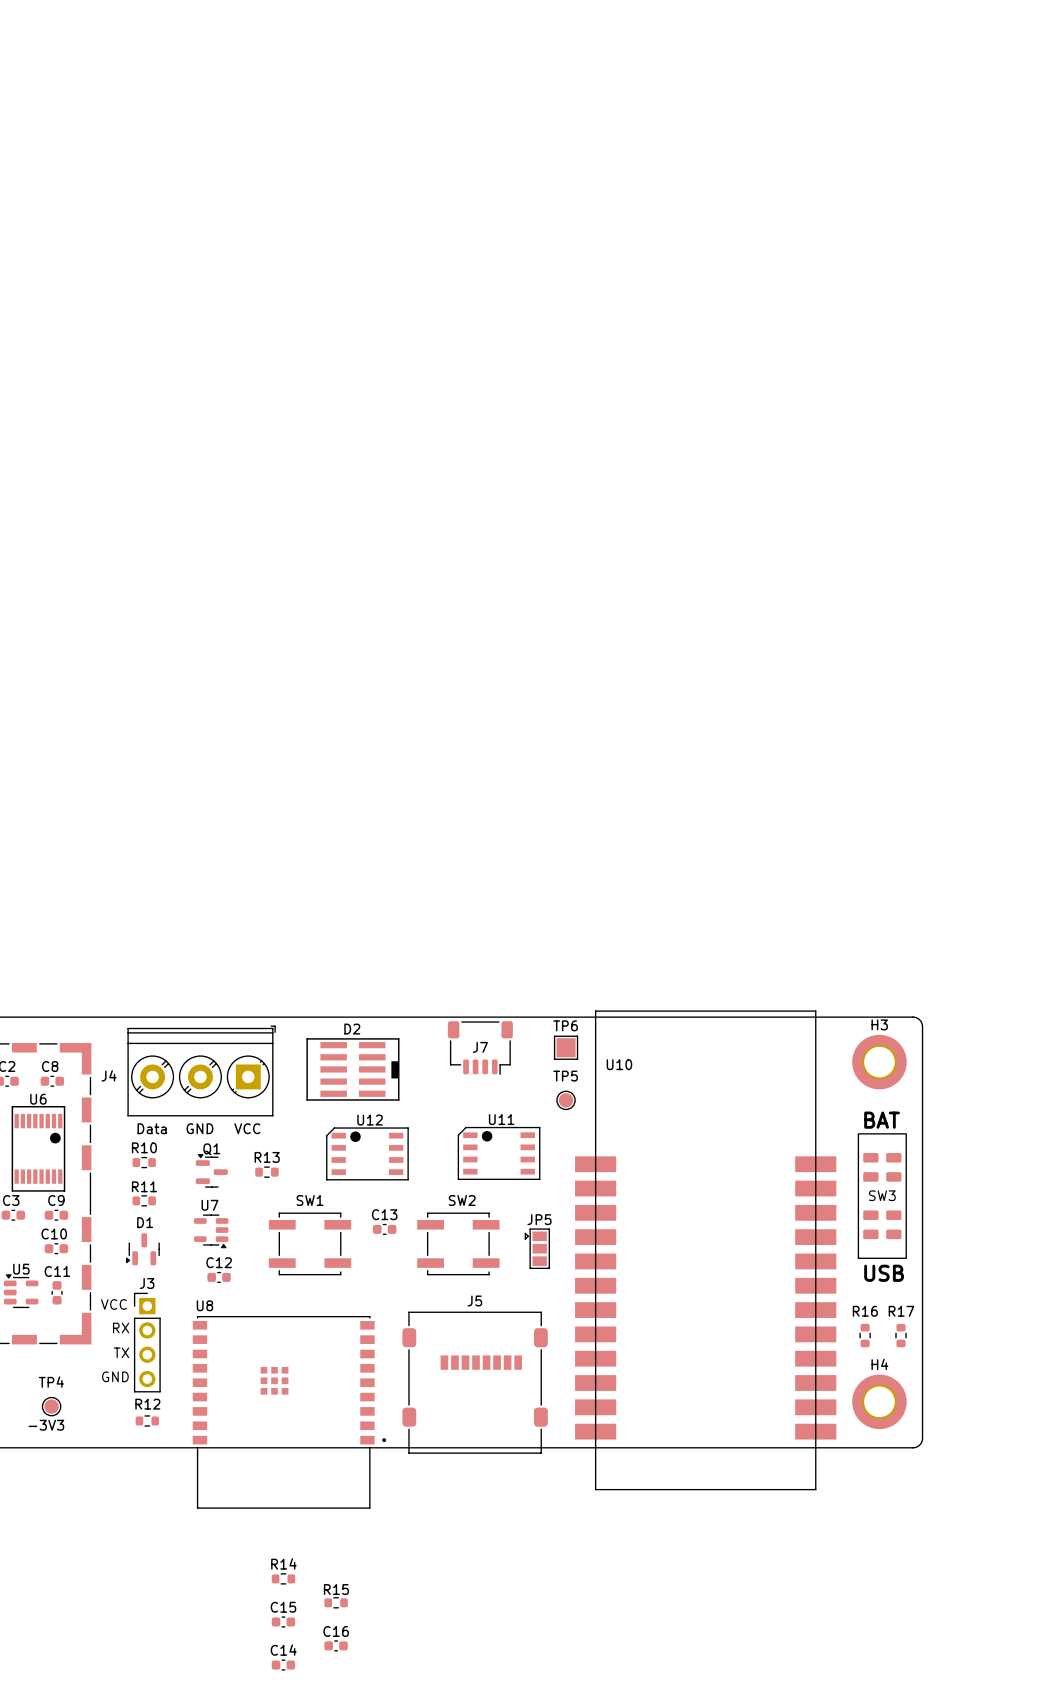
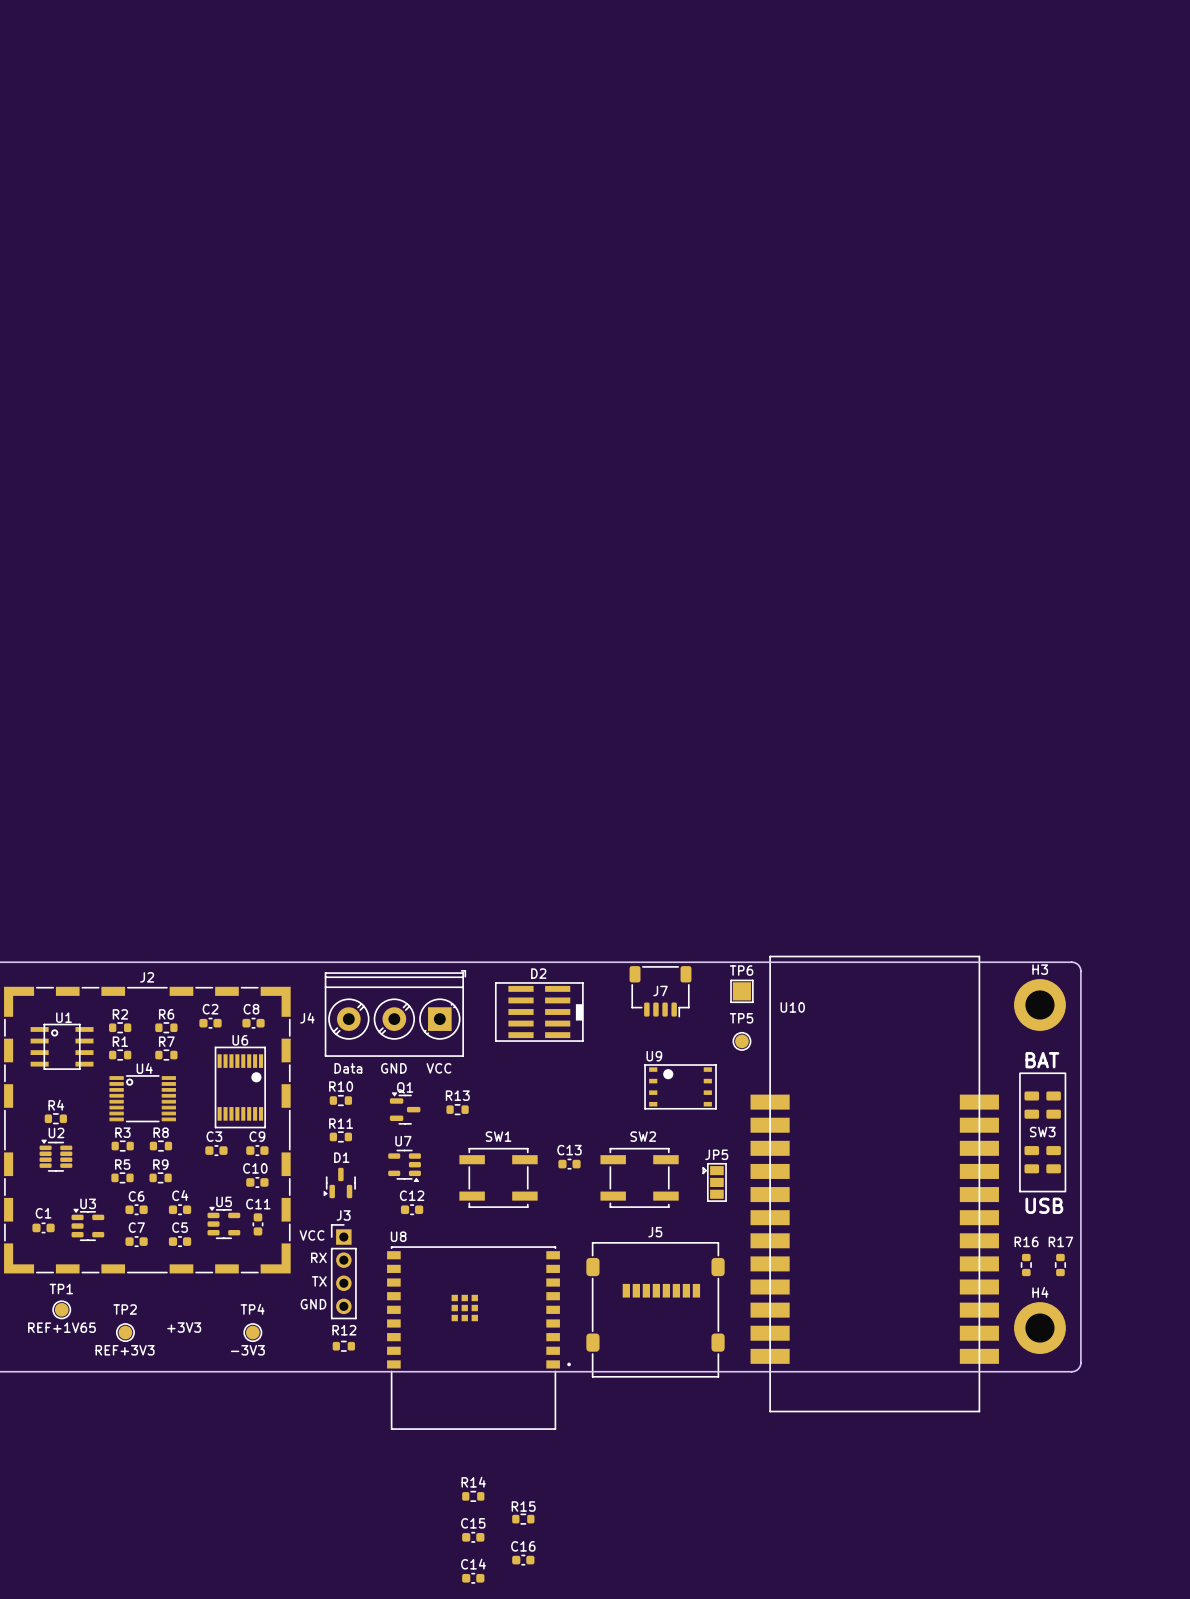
U9: none -> (680, 1086)
U12: (367, 1153) -> none
U11: (499, 1153) -> none

